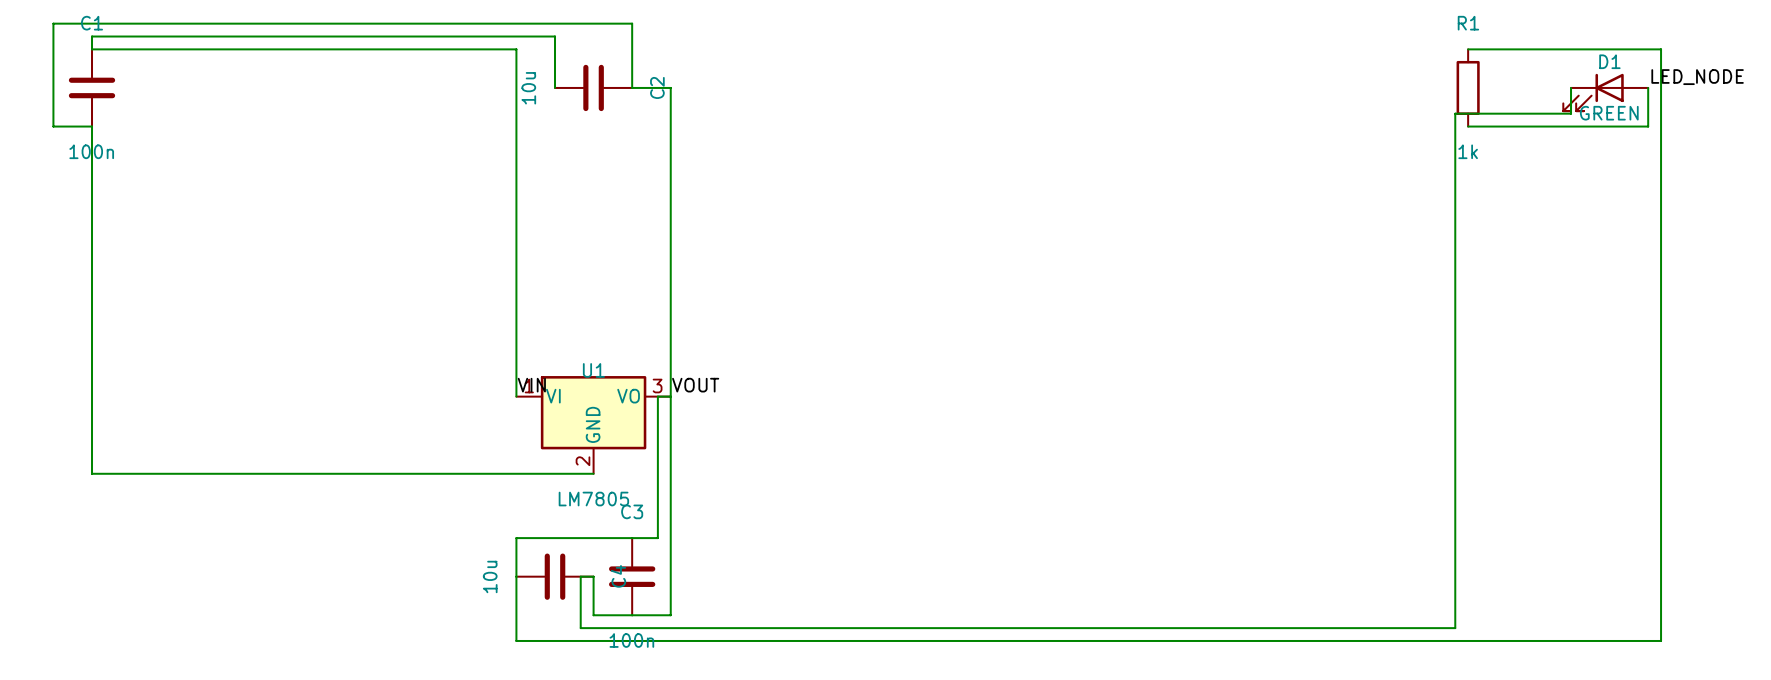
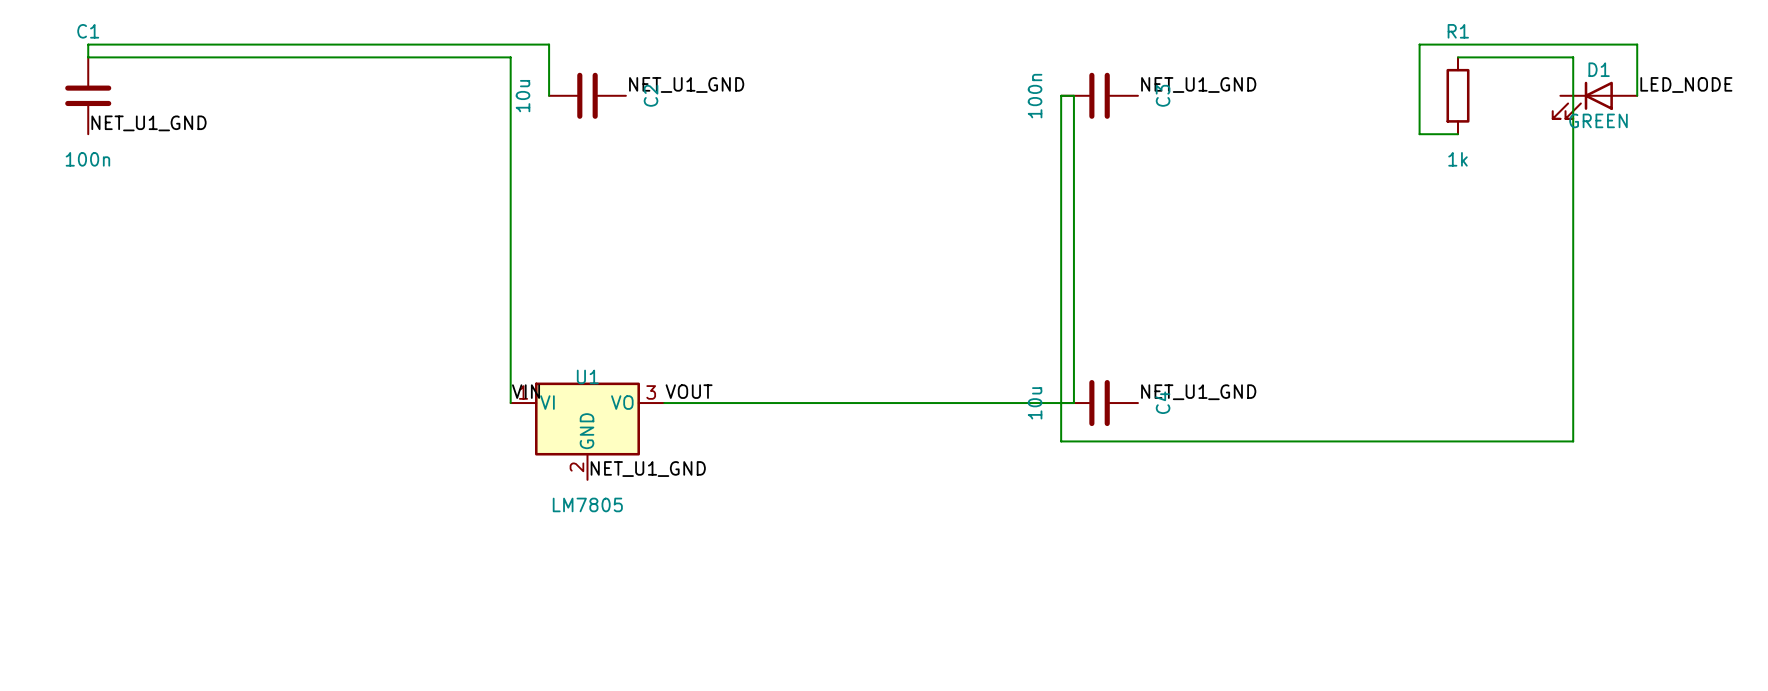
wire: (1583, 49) (1661, 49) (1661, 640) (516, 640) (516, 538) (657, 538) (657, 396) (670, 396) -> (1573, 57) (1573, 441) (1061, 441) (1061, 95) (1073, 95) (1073, 403) (664, 403)
label: none -> NET_U1_GND (686, 84)
label: none -> NET_U1_GND (1198, 84)
wire: (1571, 87) (1571, 113) (1455, 113) (1455, 628) (580, 628) (580, 576) (593, 576) (593, 615) (670, 615) (670, 87) (632, 87) (632, 23) (53, 23) (53, 126) (92, 126) (92, 473) (593, 473) -> none
wire: (1648, 87) (1648, 126) (1468, 126) -> (1637, 95) (1637, 44) (1419, 44) (1419, 134) (1457, 134)
label: none -> NET_U1_GND (148, 123)
label: none -> NET_U1_GND (1198, 392)
label: none -> NET_U1_GND (648, 469)
C4 position: (555, 576) -> (1099, 403)
C3 rotation: 0° (632, 576) -> 90° clockwise (1099, 95)
C3 position: (632, 576) -> (1099, 95)

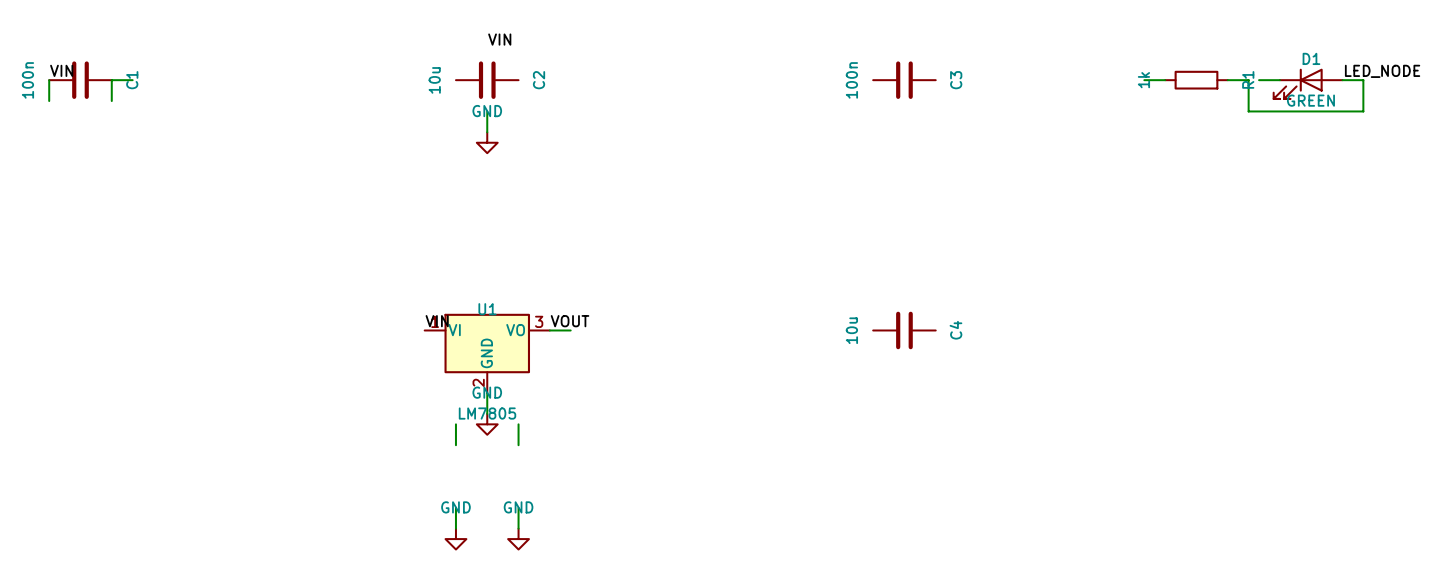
label: none -> VIN (499, 39)
wire: (1457, 57) (1573, 57) (1573, 441) (1061, 441) (1061, 95) (1073, 95) (1073, 403) (689, 403) -> none
label: none -> VIN (61, 70)
label: NET_U1_GND (686, 84) -> none
label: NET_U1_GND (1198, 84) -> none
wire: none -> (49, 80) (49, 101)
C1 rotation: 0° (88, 95) -> 90° clockwise (80, 80)
wire: none -> (132, 80) (111, 80) (111, 101)
wire: (549, 95) (549, 44) (88, 44) (88, 57) (510, 57) (510, 403) -> none
wire: none -> (1144, 80) (1165, 80)
R1 rotation: 0° (1457, 95) -> 90° clockwise (1196, 80)
wire: none -> (1259, 80) (1279, 80)
wire: (1637, 95) (1637, 44) (1419, 44) (1419, 134) (1457, 134) -> (1342, 80) (1363, 80) (1363, 111) (1248, 111) (1248, 80) (1227, 80)
label: NET_U1_GND (148, 123) -> none
wire: none -> (487, 111) (487, 132)
power symbol: none -> GND (487, 142)
label: NET_U1_GND (1198, 392) -> none
label: NET_U1_GND (648, 469) -> none
wire: none -> (487, 393) (487, 413)
wire: none -> (455, 424) (455, 445)
power symbol: none -> GND (487, 424)
wire: none -> (518, 424) (518, 445)
wire: none -> (455, 507) (455, 528)
wire: none -> (518, 507) (518, 528)
power symbol: none -> GND (455, 539)
power symbol: none -> GND (518, 539)

